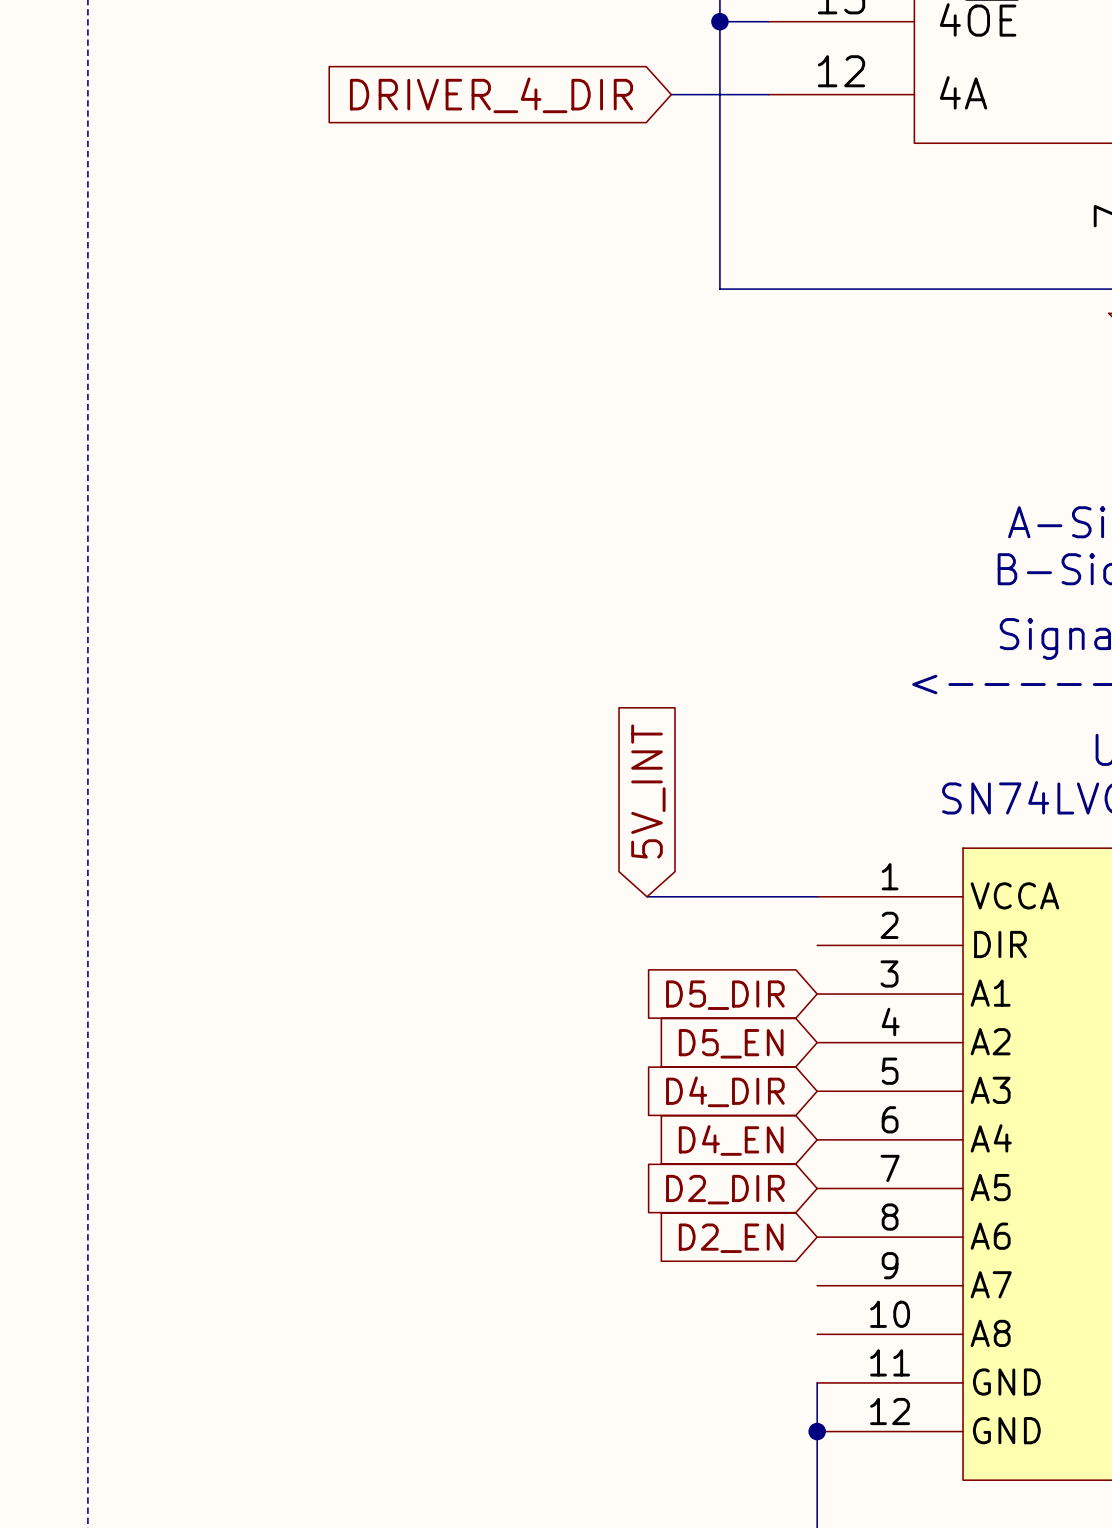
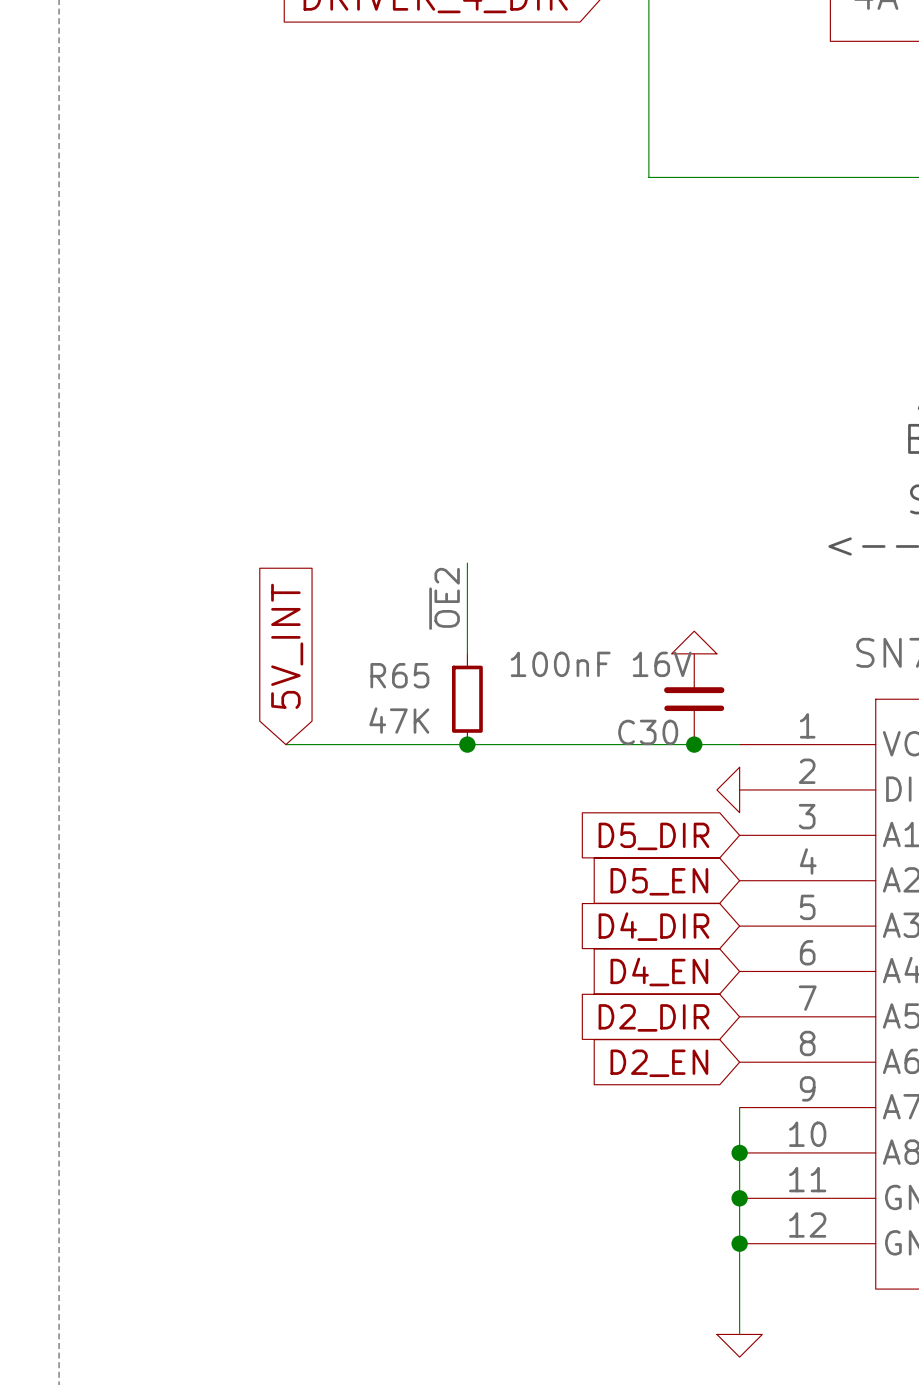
wire: none -> (467, 563) (467, 653)
label: none -> ~{OE}2 (444, 598)
power symbol: none -> (694, 642)
global label position: 5V_INT (648, 791) -> 5V_INT (287, 646)
R65: none -> 47K (467, 699)
C30: none -> 100nF 16V (694, 699)
wire: none -> (285, 744) (580, 744)
junction: none -> (467, 744)
junction: none -> (694, 744)
power symbol: none -> (728, 789)
wire: none -> (739, 1107) (739, 1198)
junction: none -> (739, 1152)
junction: none -> (739, 1198)

